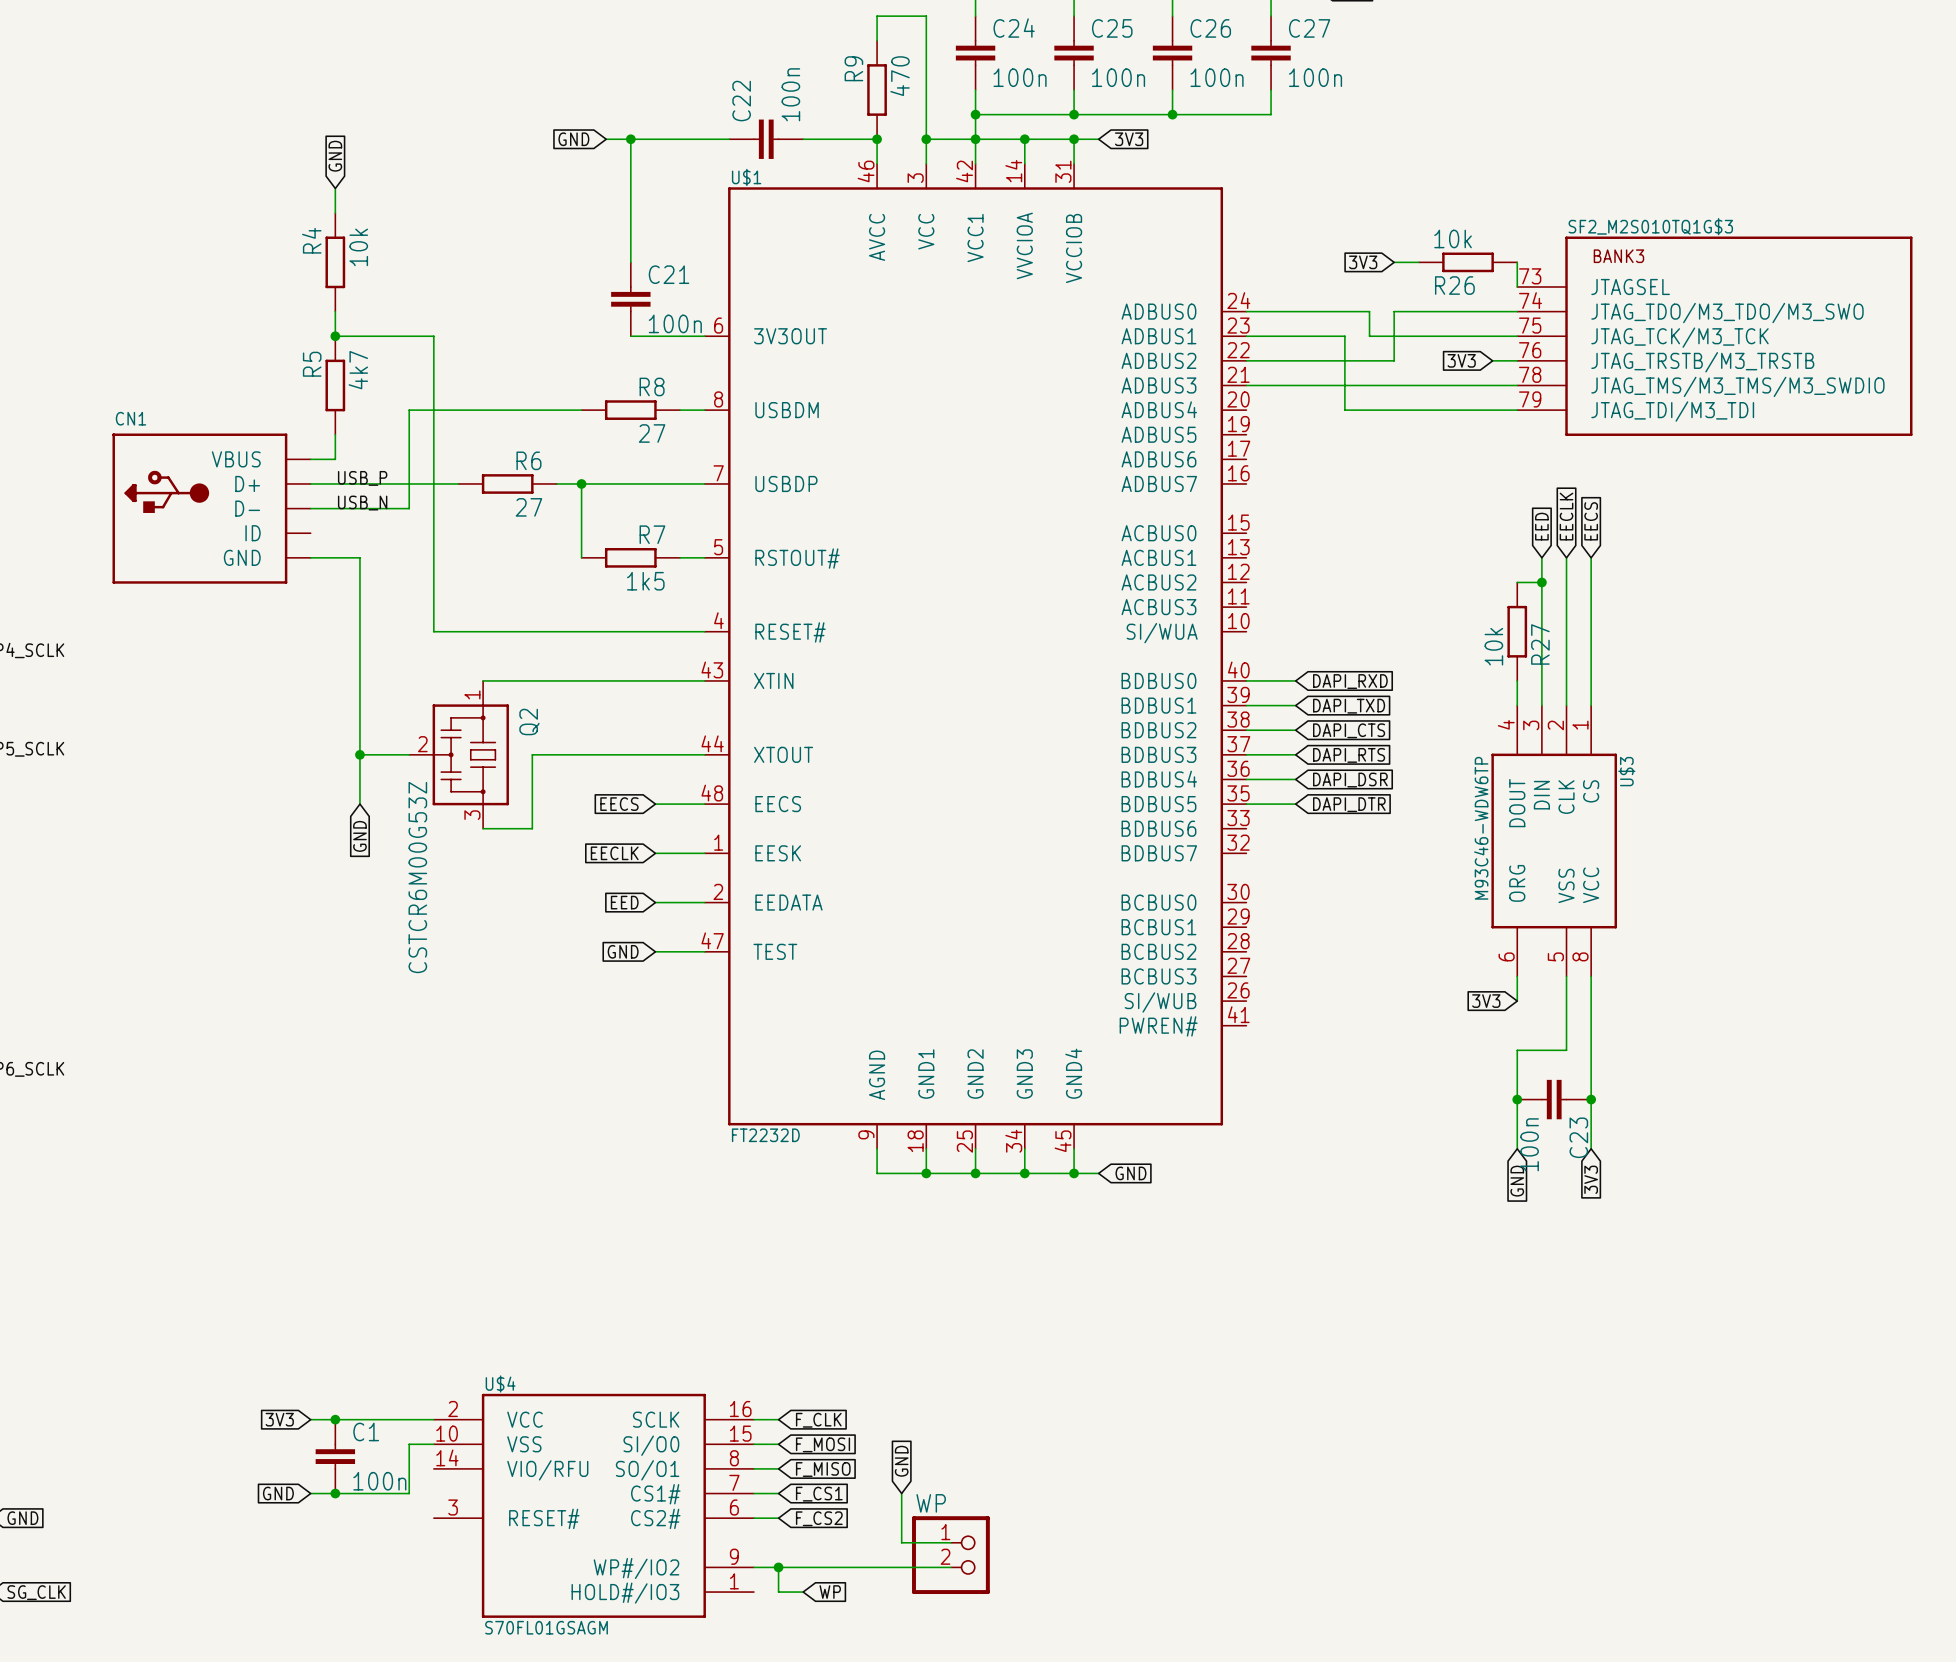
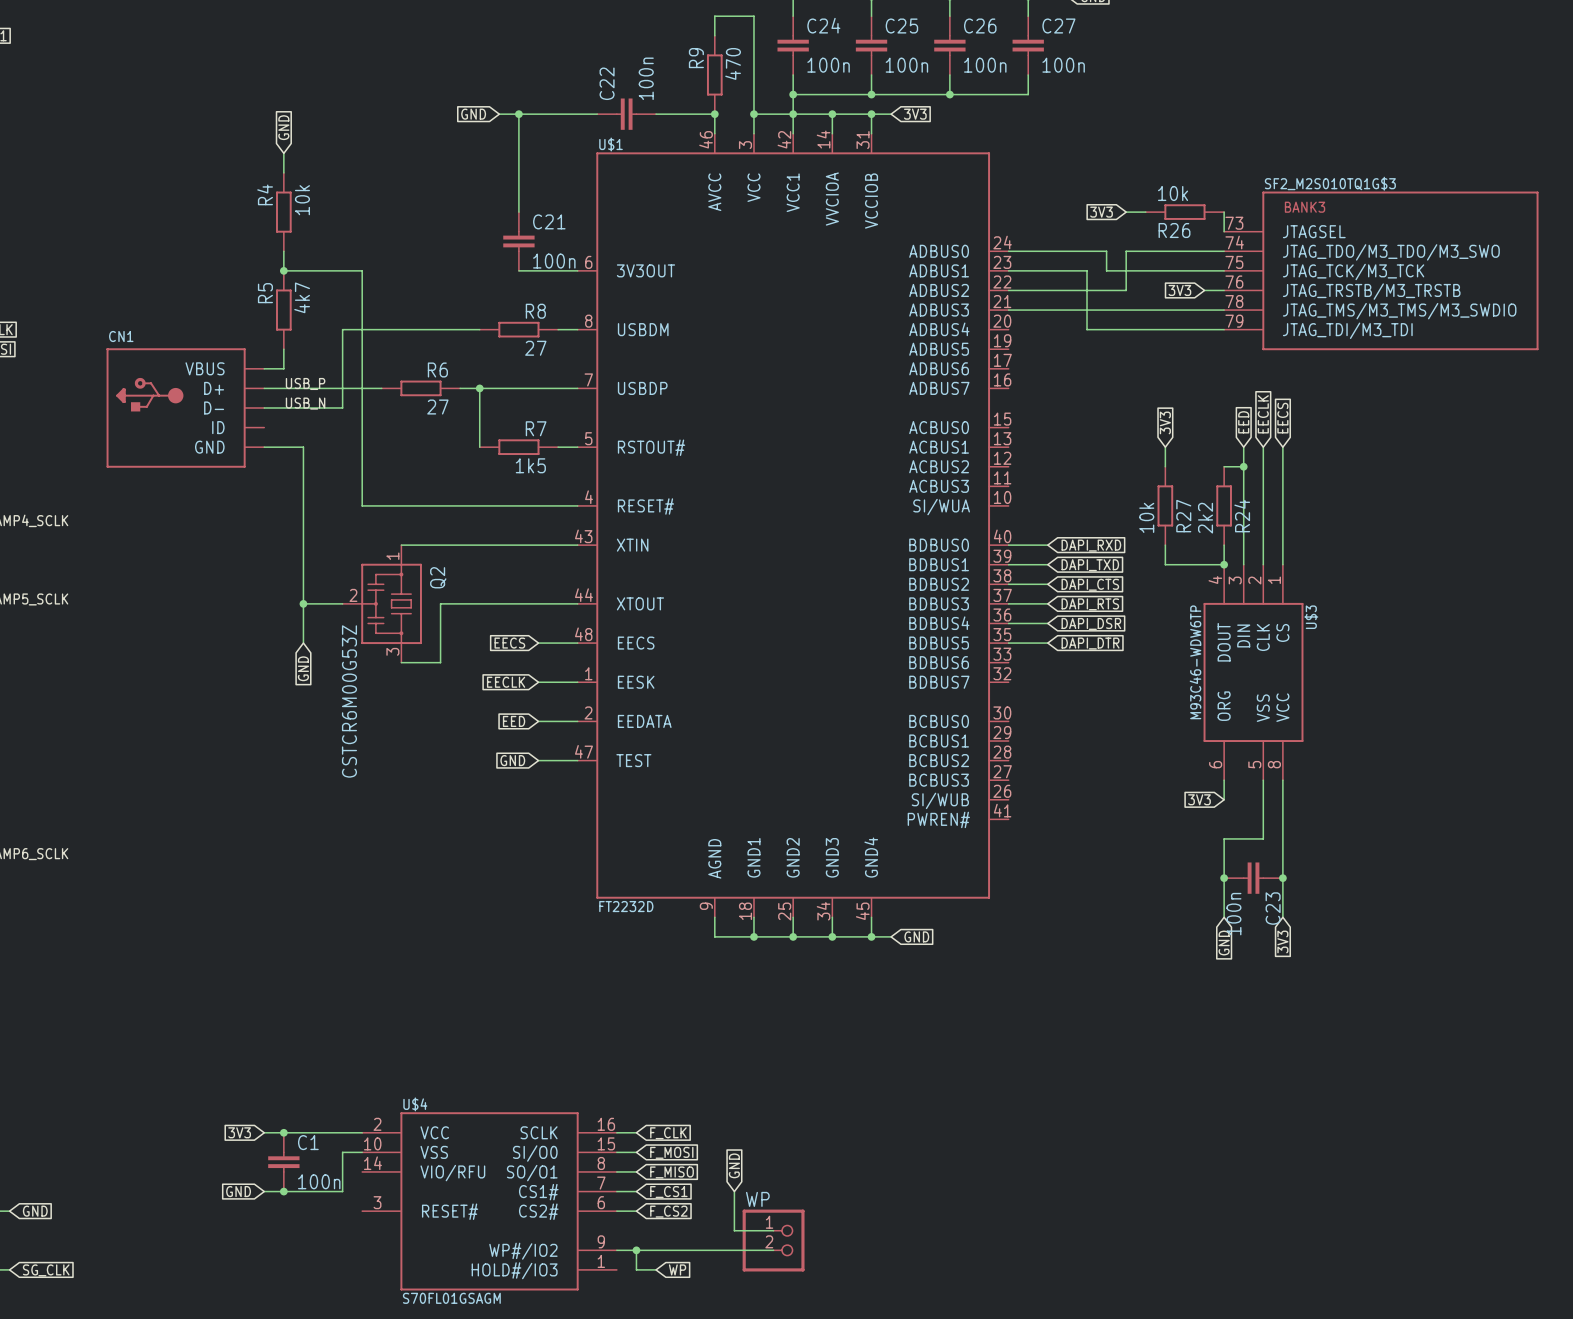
global label: none -> 3V3 (1165, 422)
wire: none -> (1165, 447) (1165, 466)
R27: none -> 10k (1165, 505)
R27 name: R27 (1540, 644) -> R24 (1242, 516)
R27 value: 10k (1493, 646) -> 2k2 (1205, 518)
wire: none -> (1165, 545) (1165, 564) (1224, 564)
junction: none -> (1224, 564)

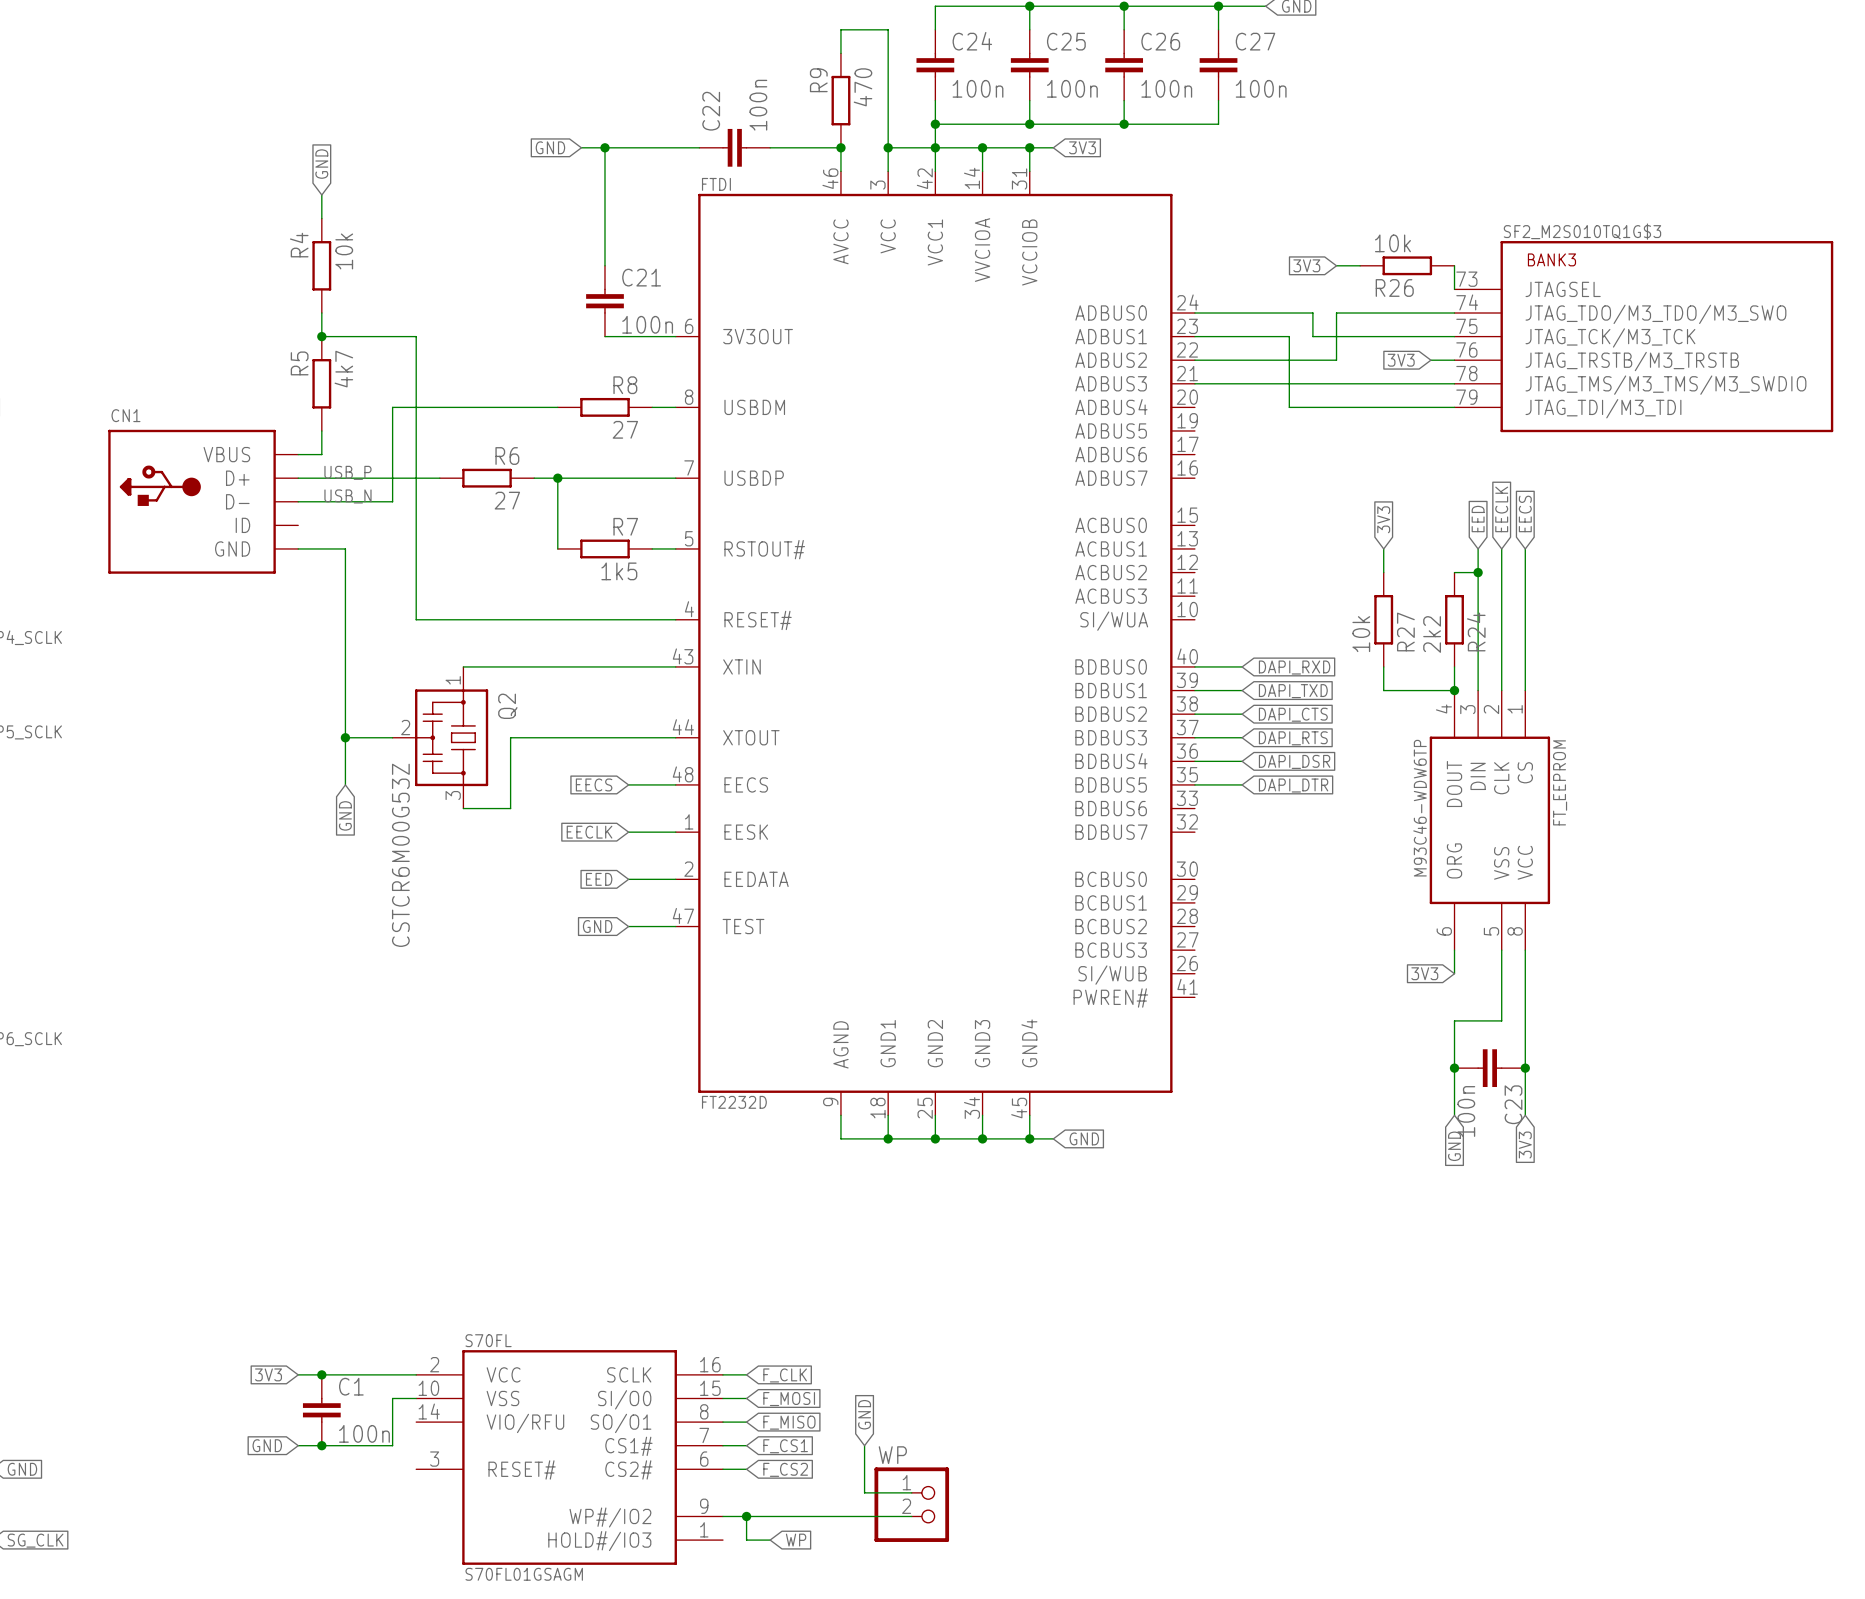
U$1 name: U$1 (611, 144) -> FTDI (716, 184)
U$3 name: U$3 (1311, 617) -> FT_EEPROM (1560, 782)
U$4 name: U$4 (415, 1104) -> S70FL (488, 1340)

